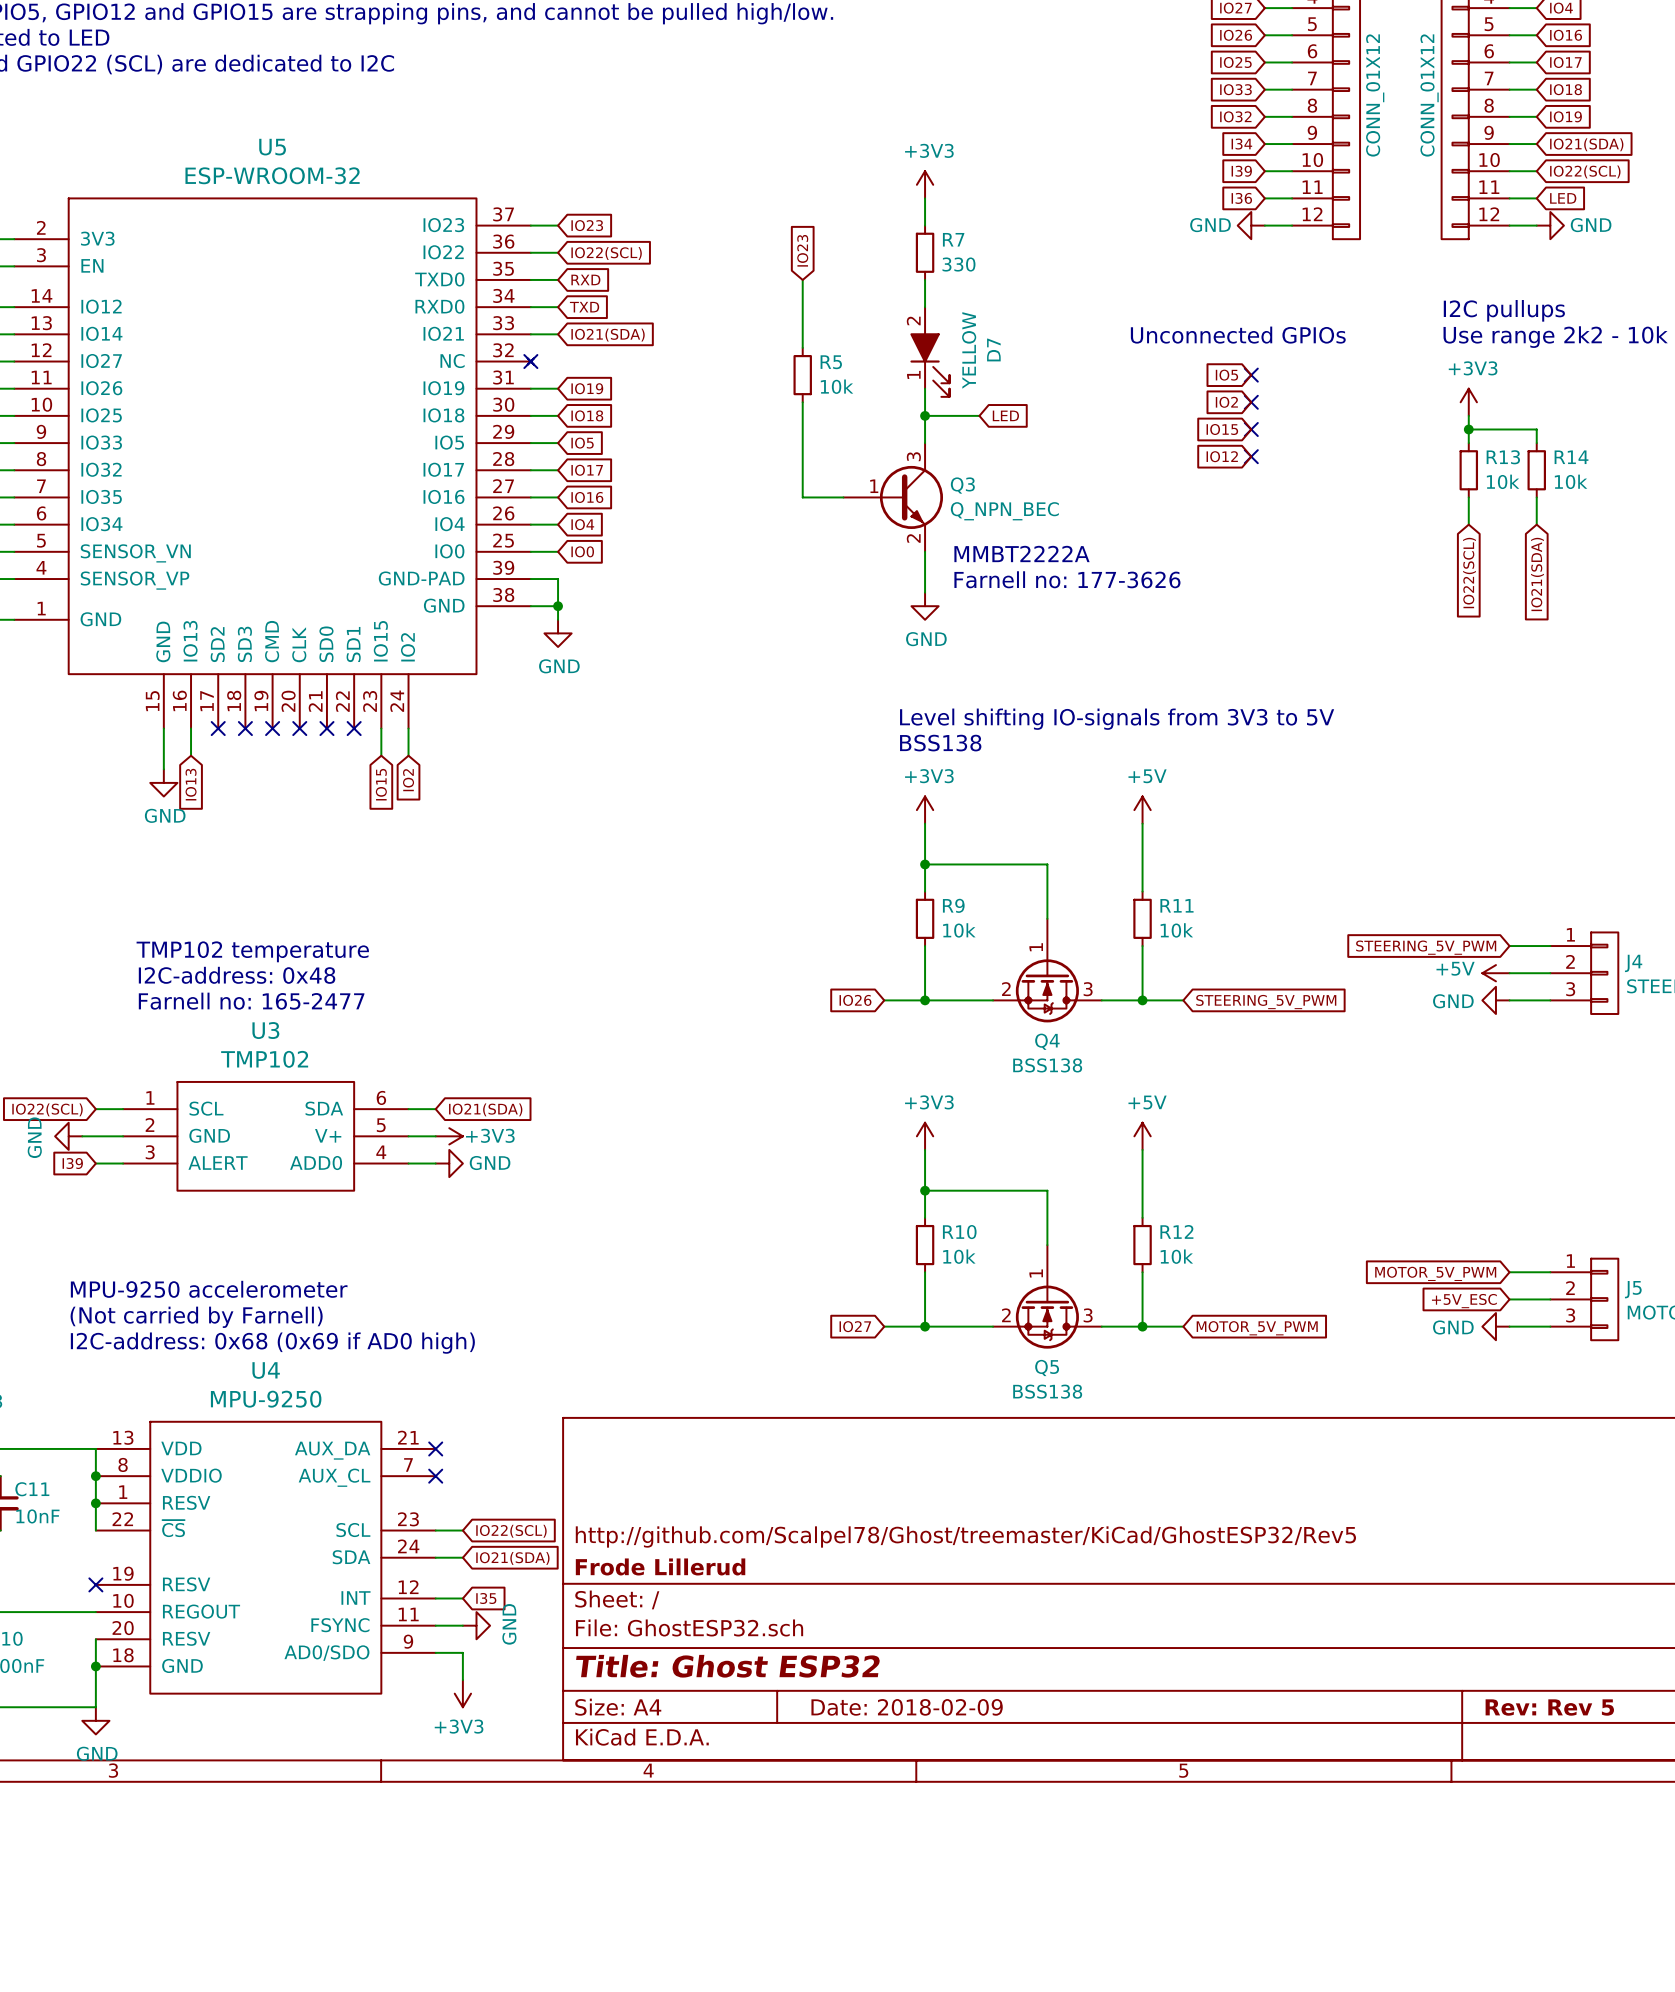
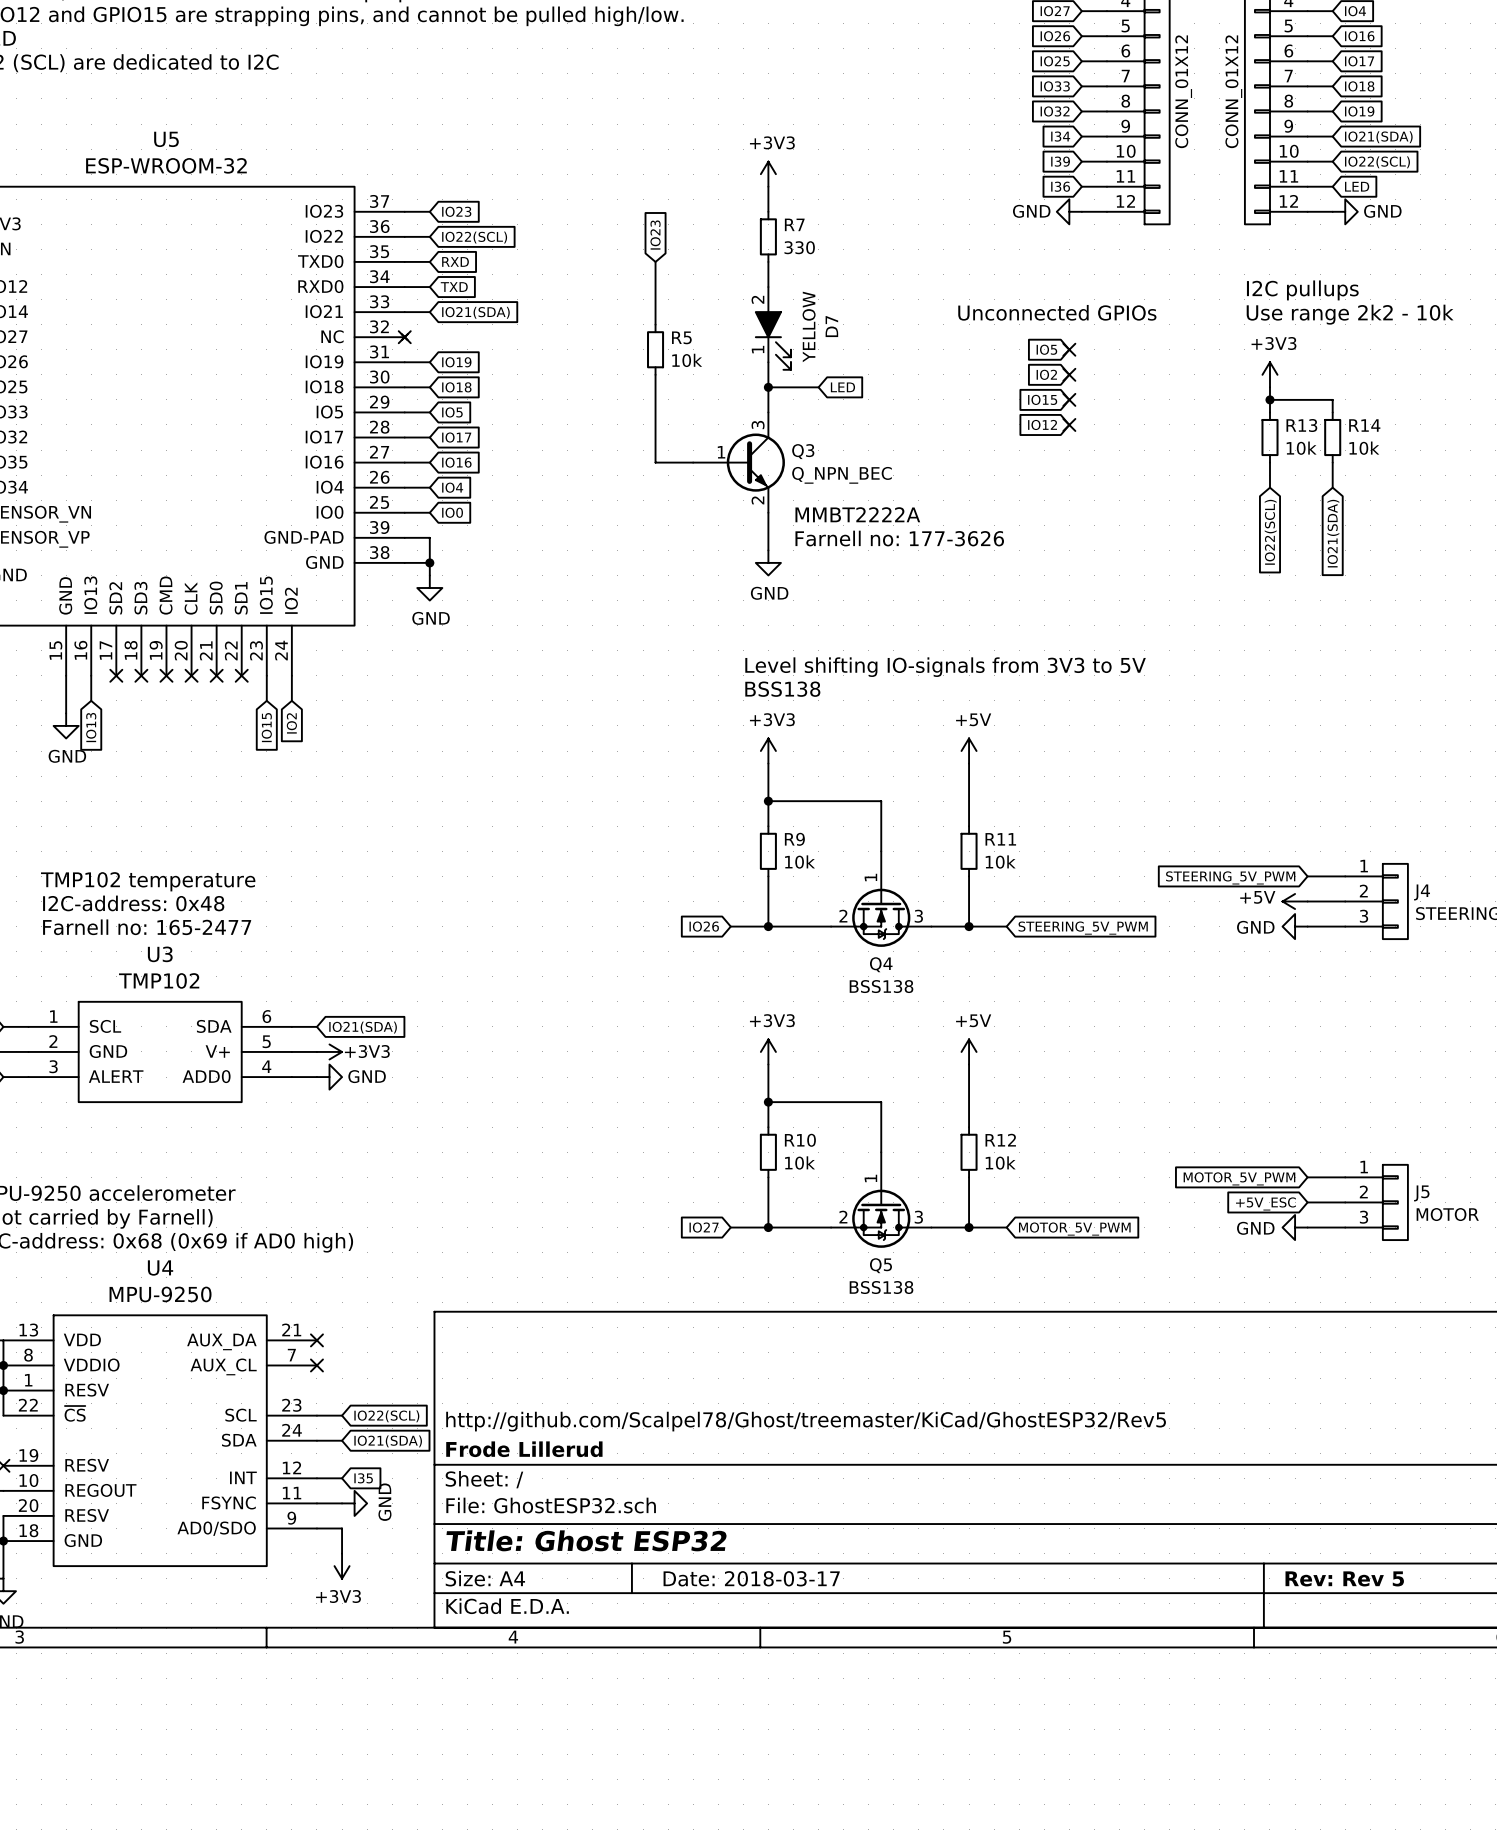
title block: Date: 2018-02-09 (907, 1707) -> Date: 2018-03-17 (751, 1578)

